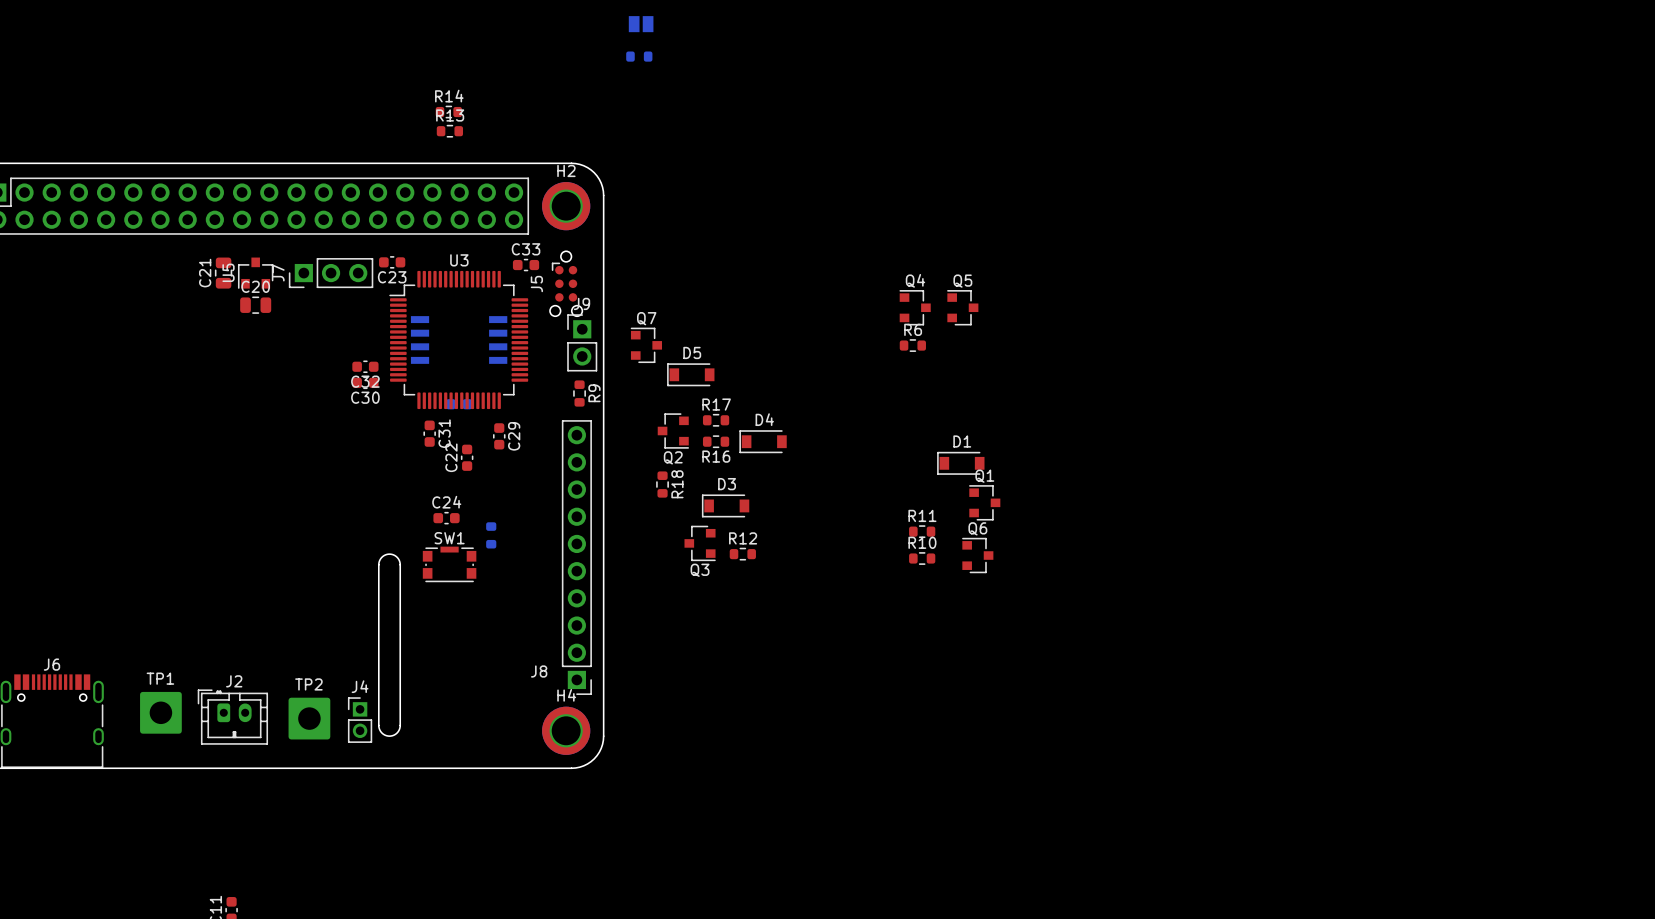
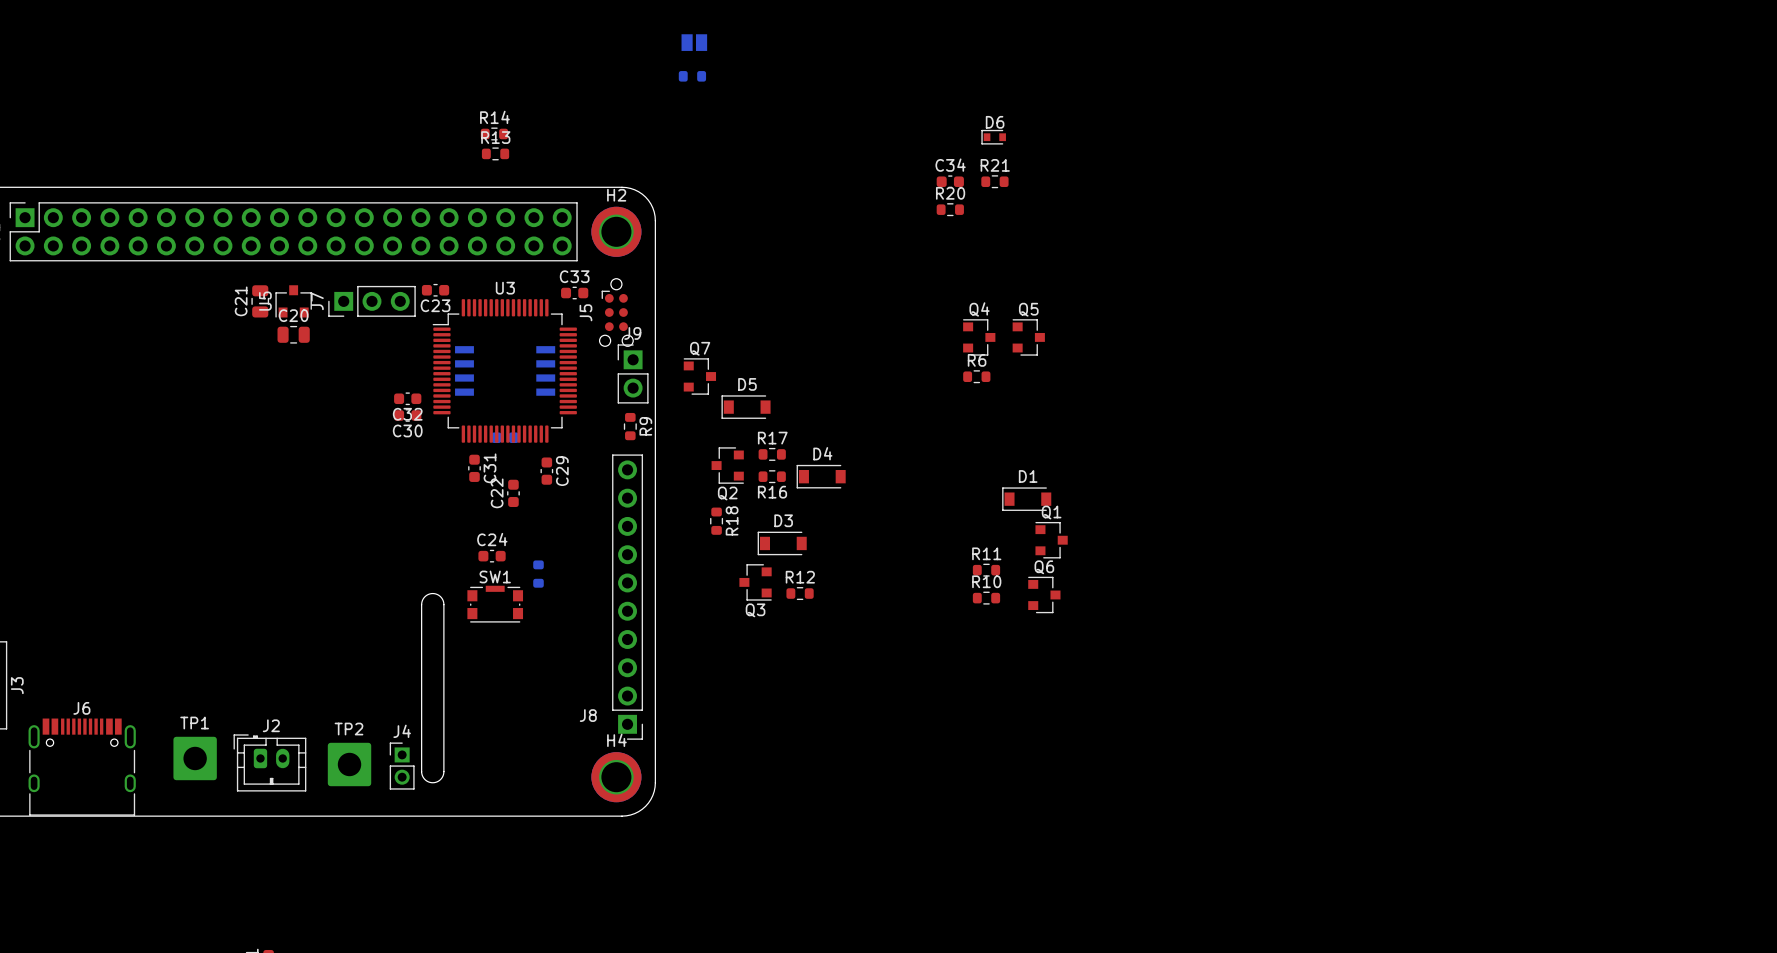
D6: none -> (993, 137)
C34: none -> (950, 181)
R21: none -> (994, 181)
R20: none -> (950, 209)

